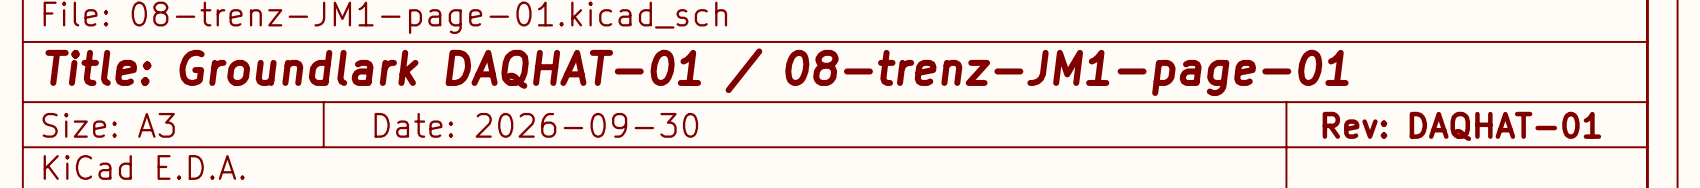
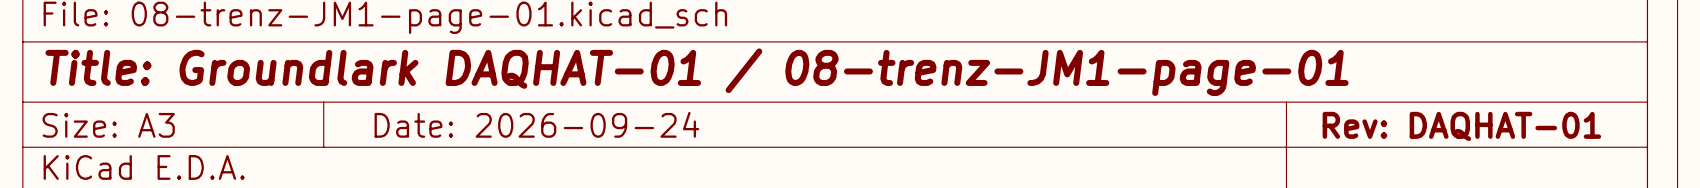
title block: Date: 2026-09-30 (536, 125) -> Date: 2026-09-24 (536, 124)

